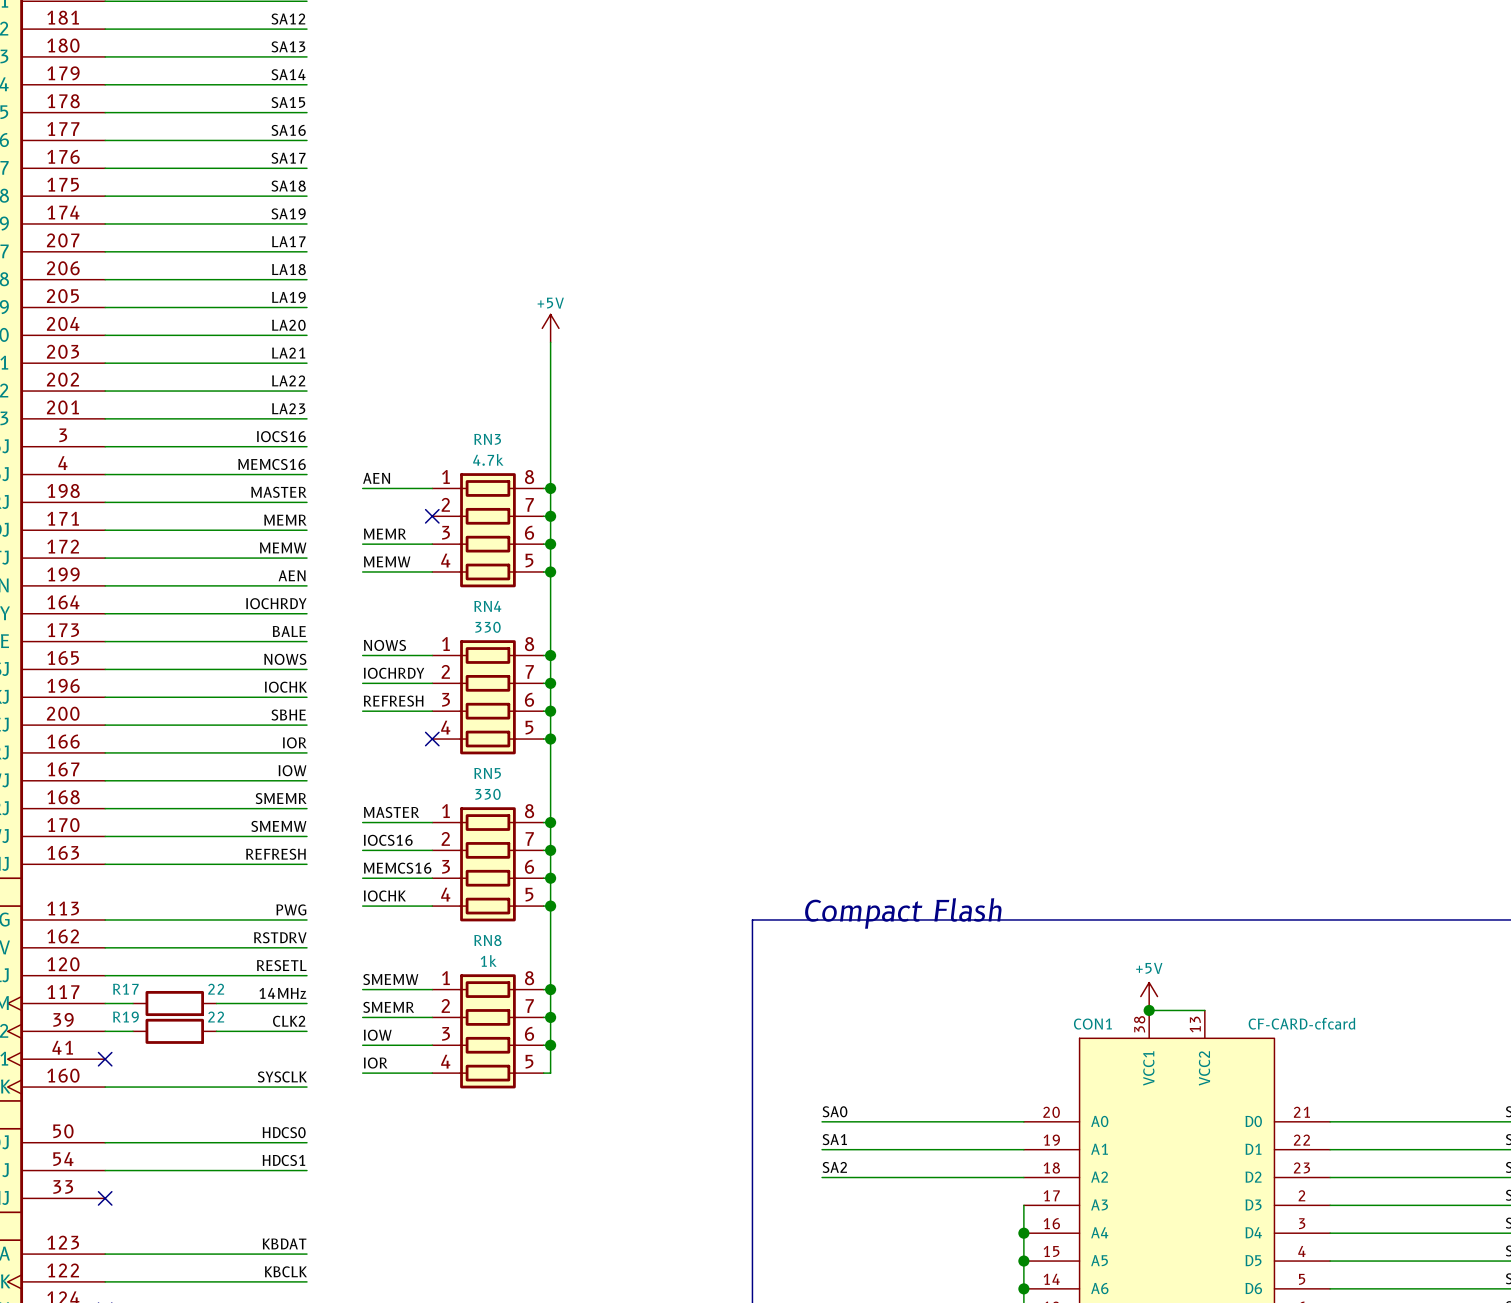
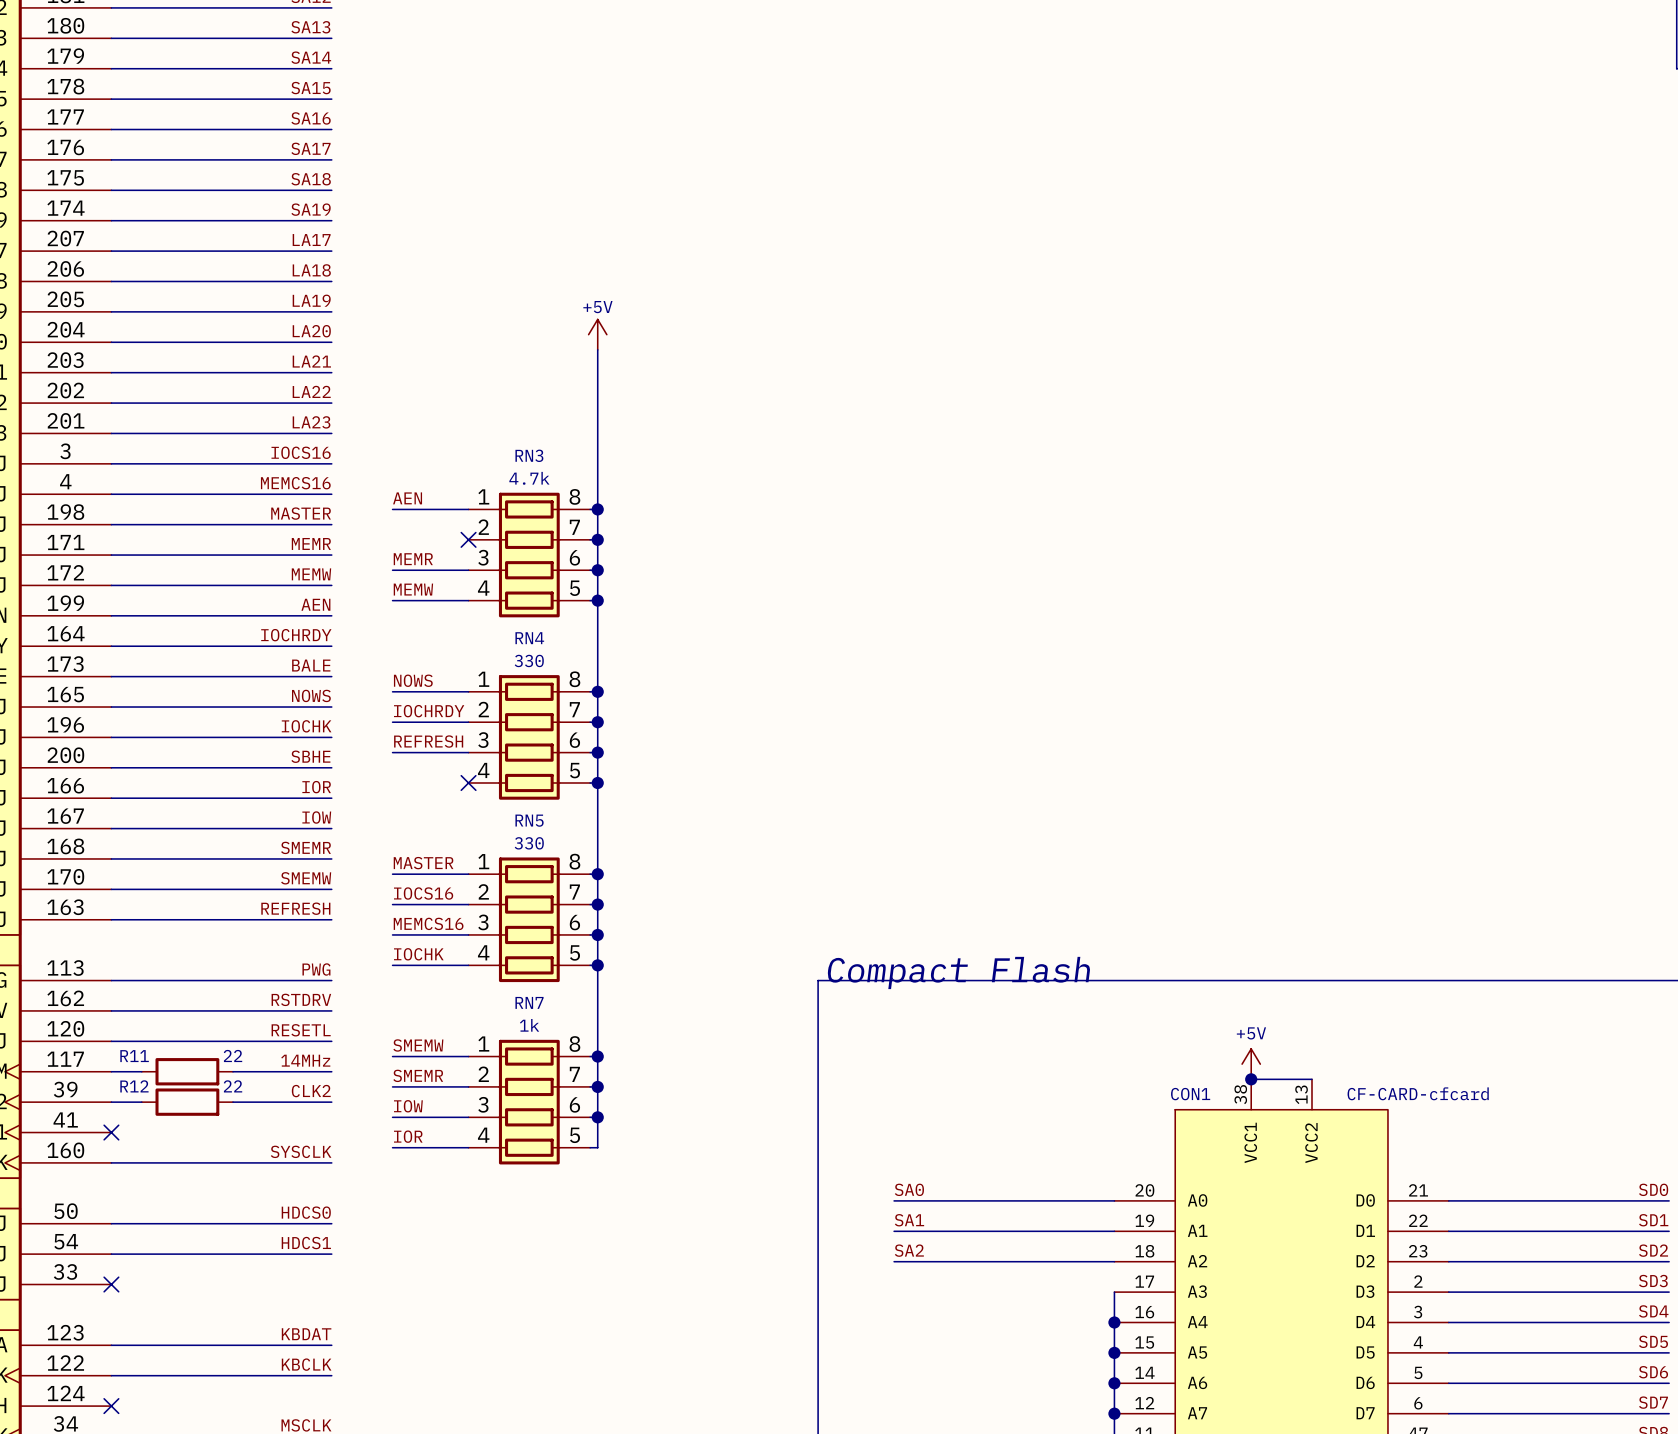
RN8 name: RN8 (487, 940) -> RN7 (529, 1002)
R17 name: R17 (125, 989) -> R11 (134, 1056)
R19 name: R19 (125, 1017) -> R12 (134, 1086)

